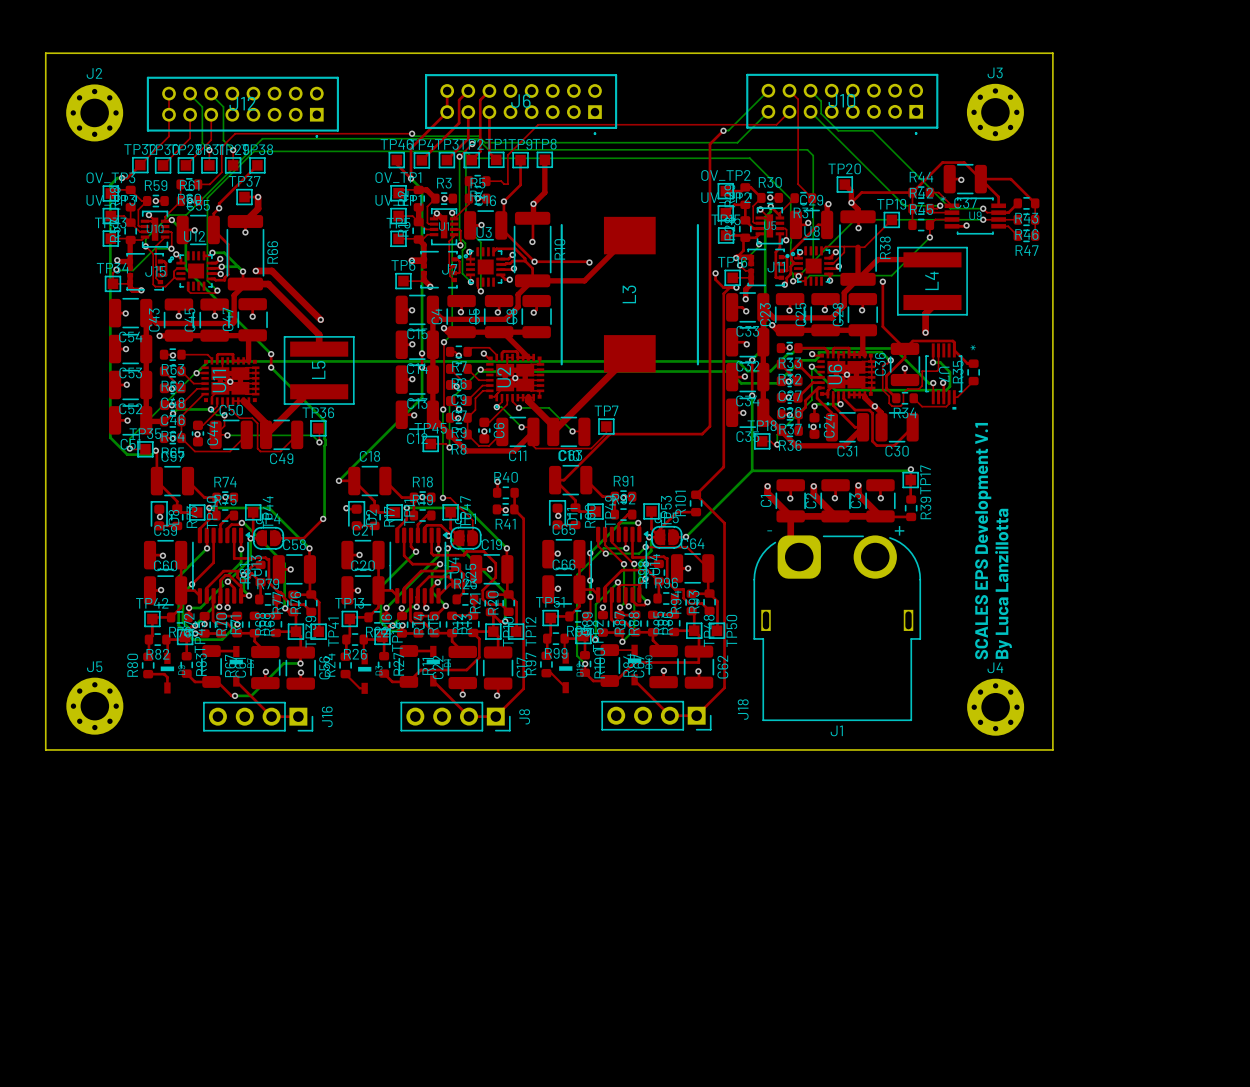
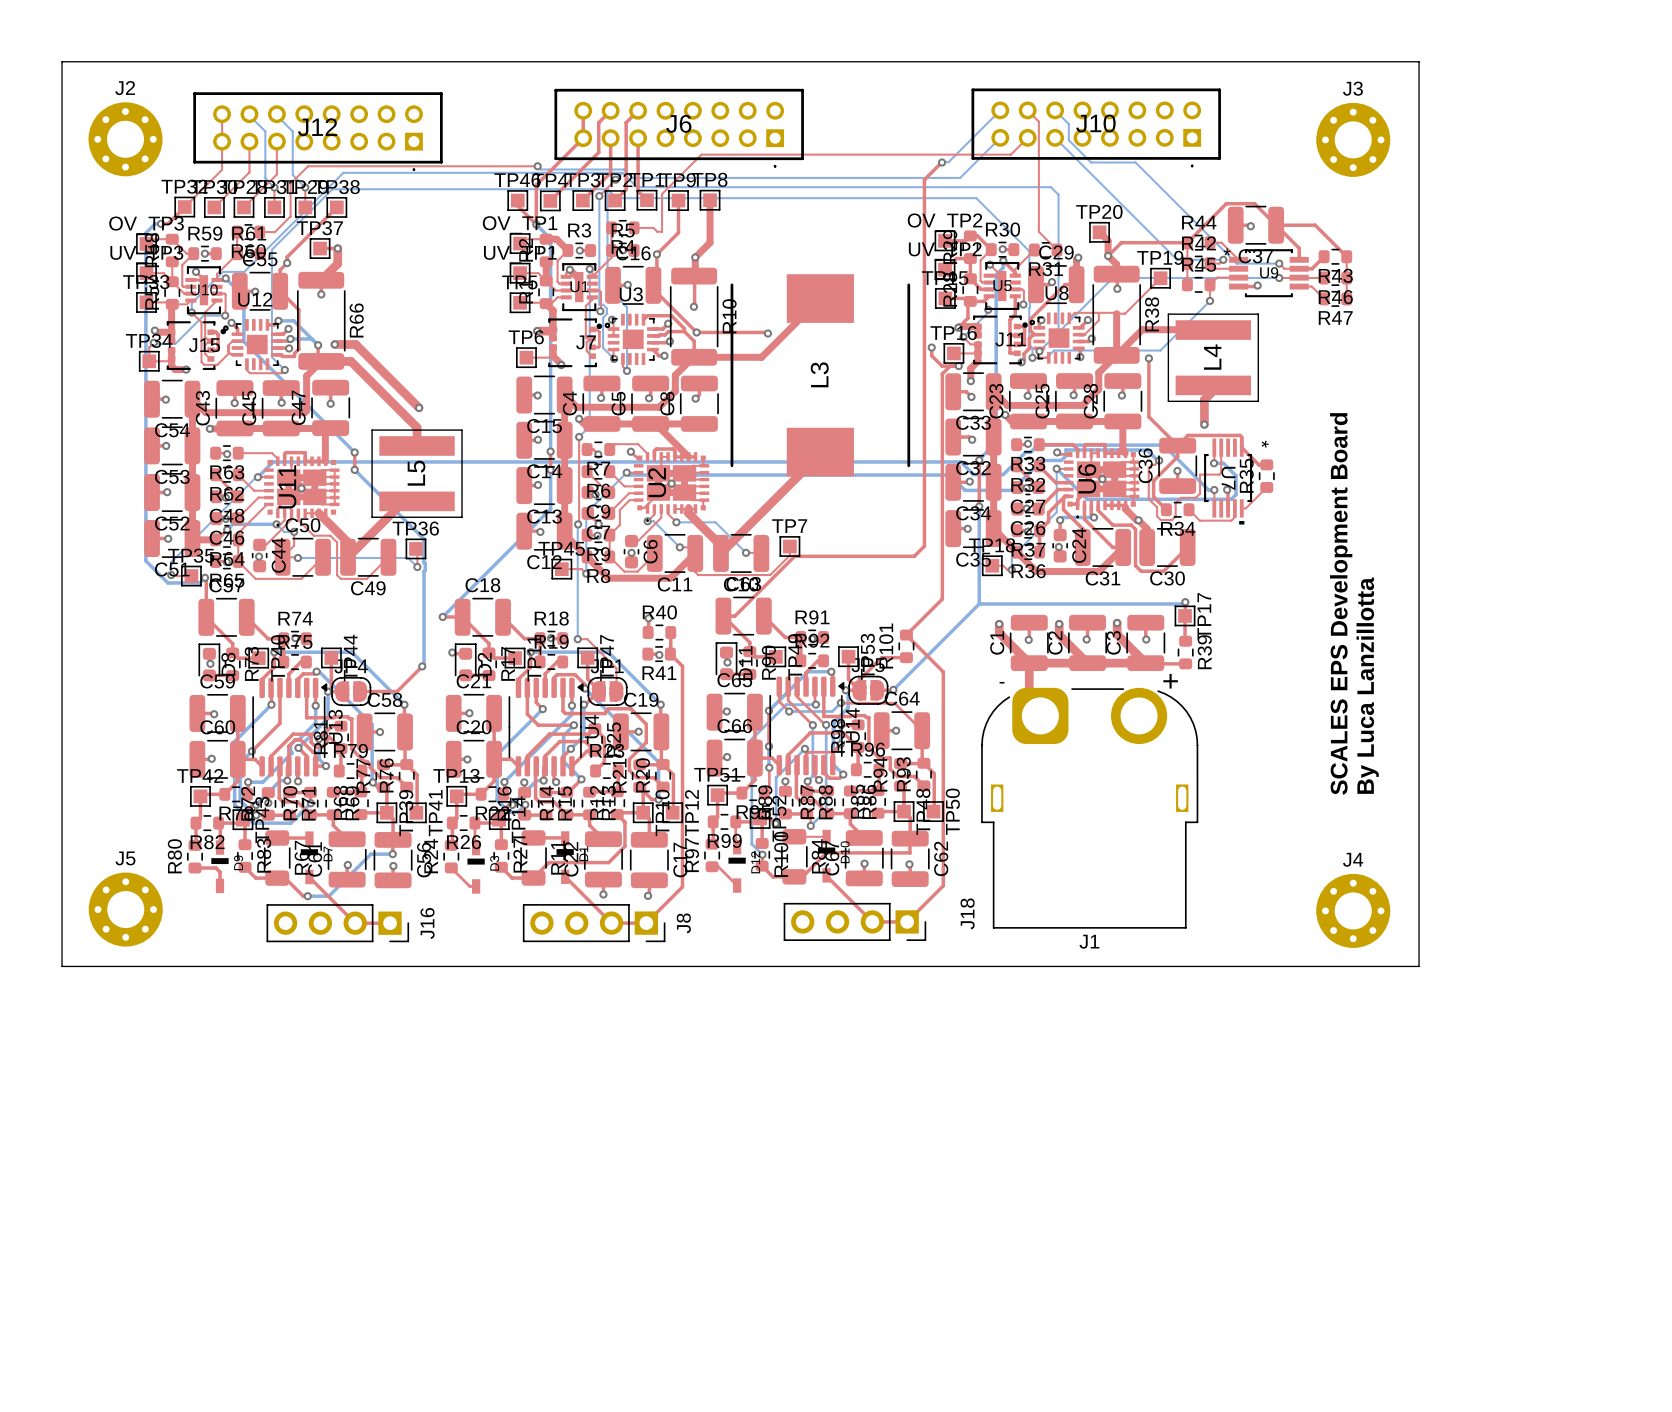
board edge: (1052, 53) (1052, 749) -> (1369, 61) (1419, 61) (1419, 966) (1369, 966)
J3 position: (995, 112) -> (1353, 139)
text: none -> SCALES EPS Development Board (1341, 603)
text: SCALES EPS Development V.1 (983, 541) -> none
text position: By Luca Lanzillotta (1003, 583) -> By Luca Lanzillotta (1367, 685)
J4 position: (995, 707) -> (1353, 910)

